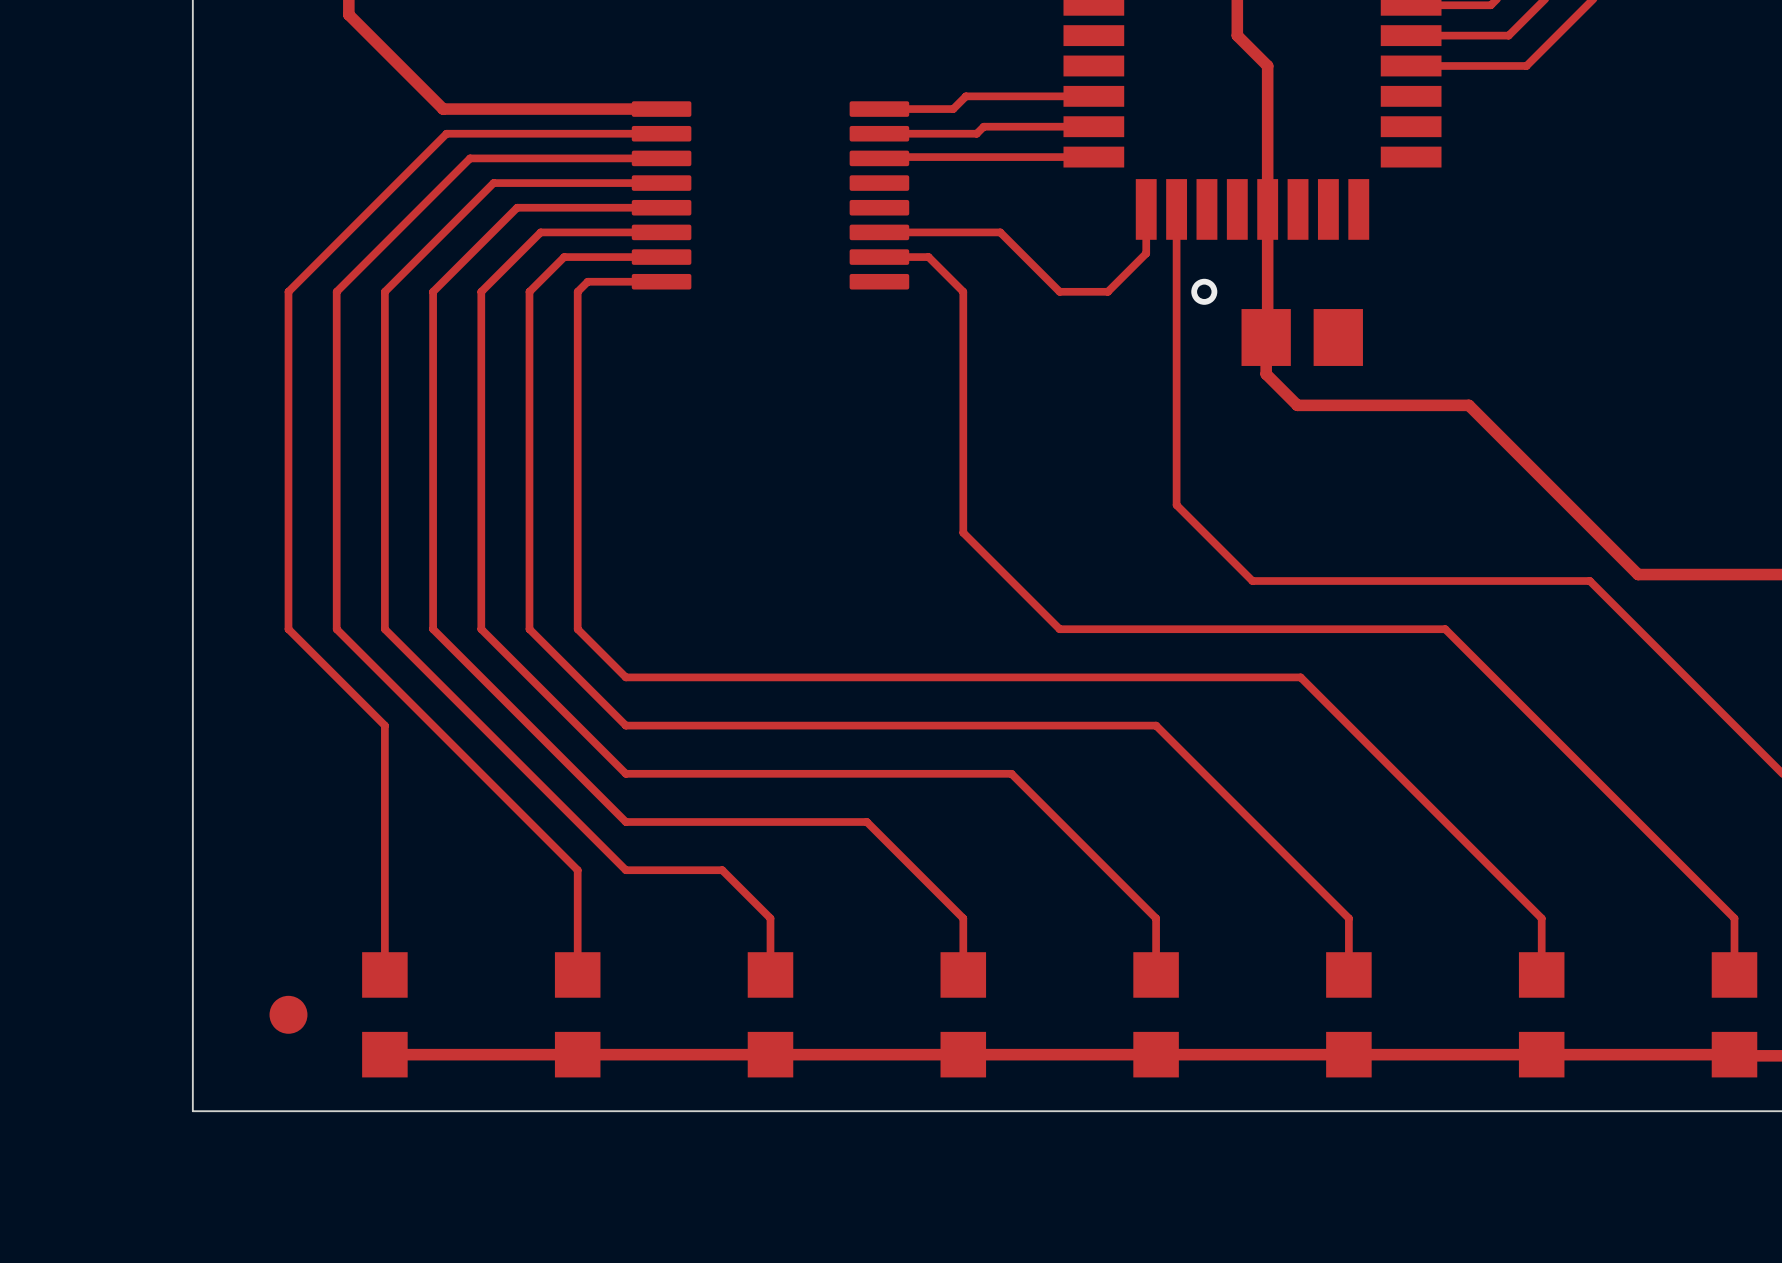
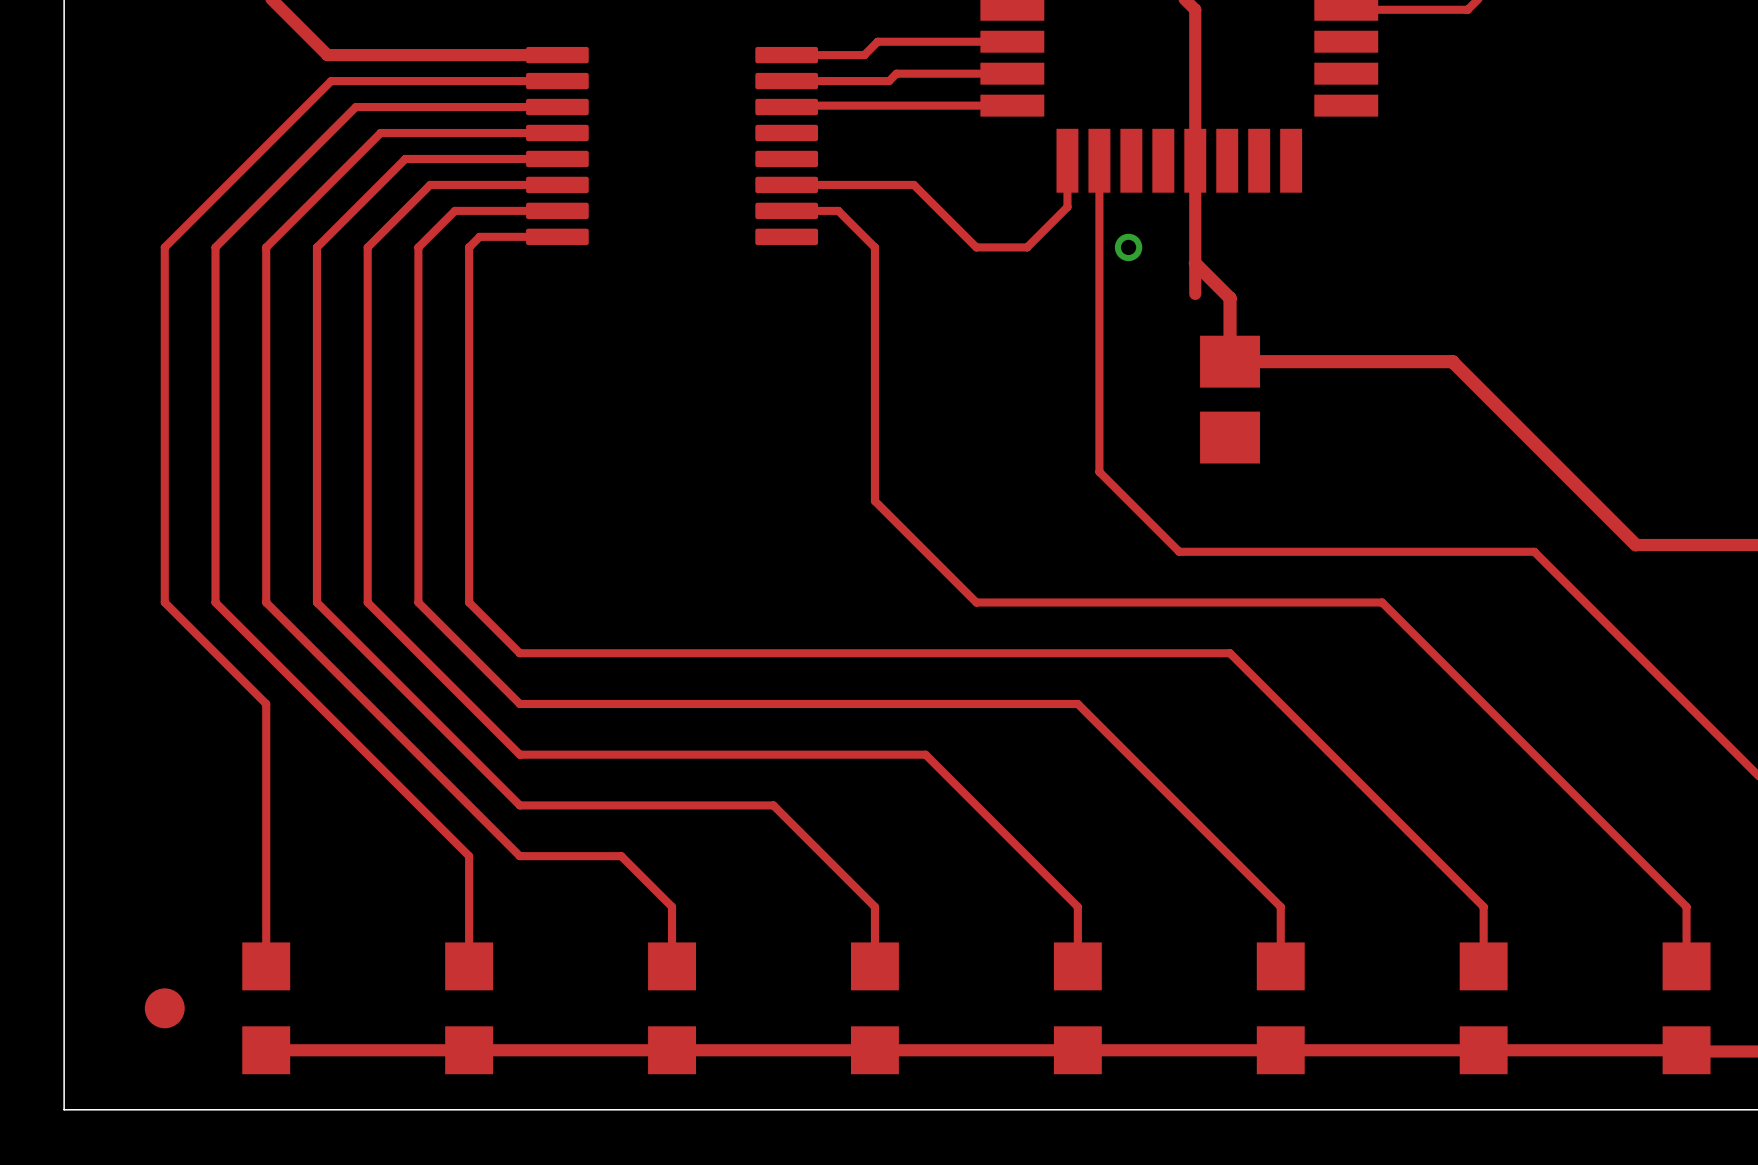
top track: (1267, 336) (1266, 374) (1297, 405) (1468, 405) (1638, 574) (1686, 574) -> (1195, 263) (1230, 298) (1230, 361) (1452, 361) (1635, 545)
part rotation: 0° (1302, 337) -> 90° clockwise (1230, 399)
part position: (1302, 337) -> (1230, 399)

